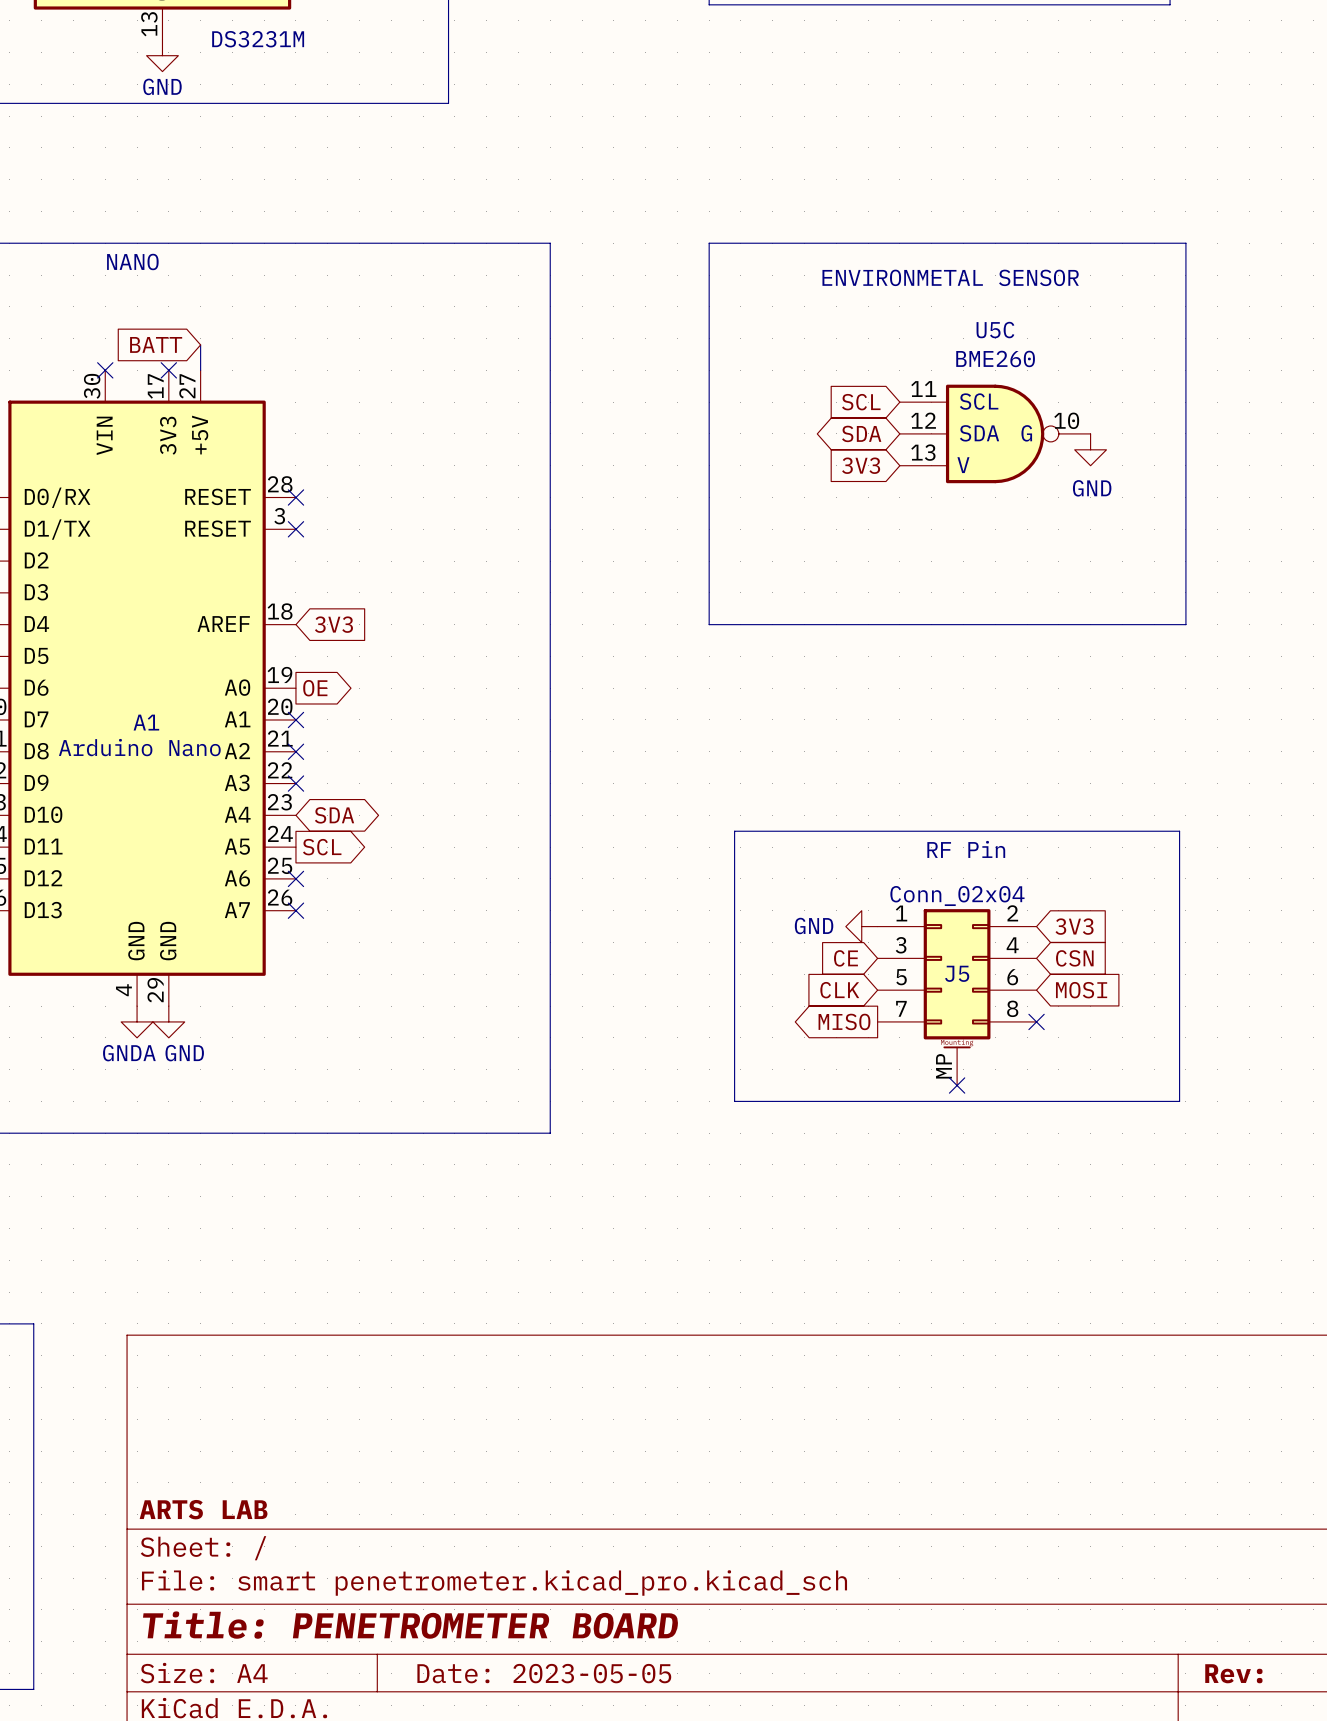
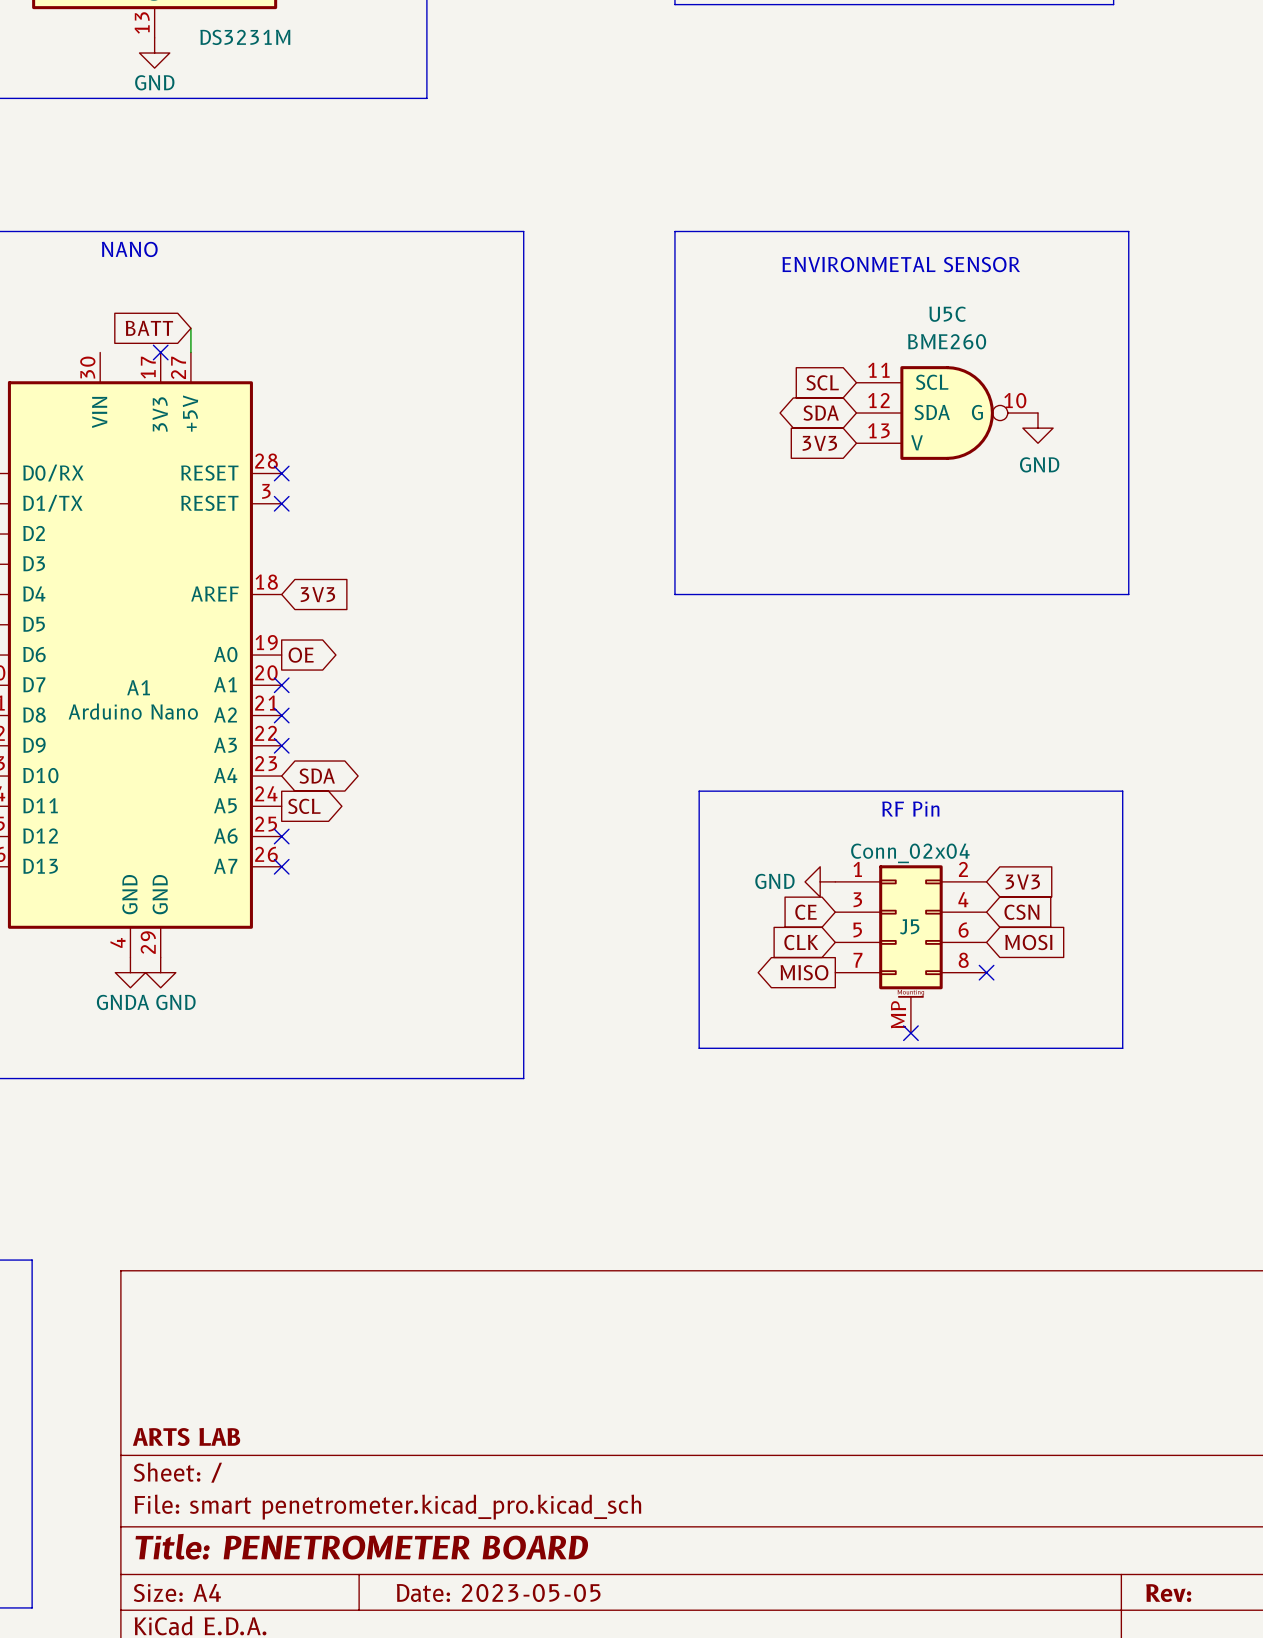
no-connect mark: (105, 370) -> none

